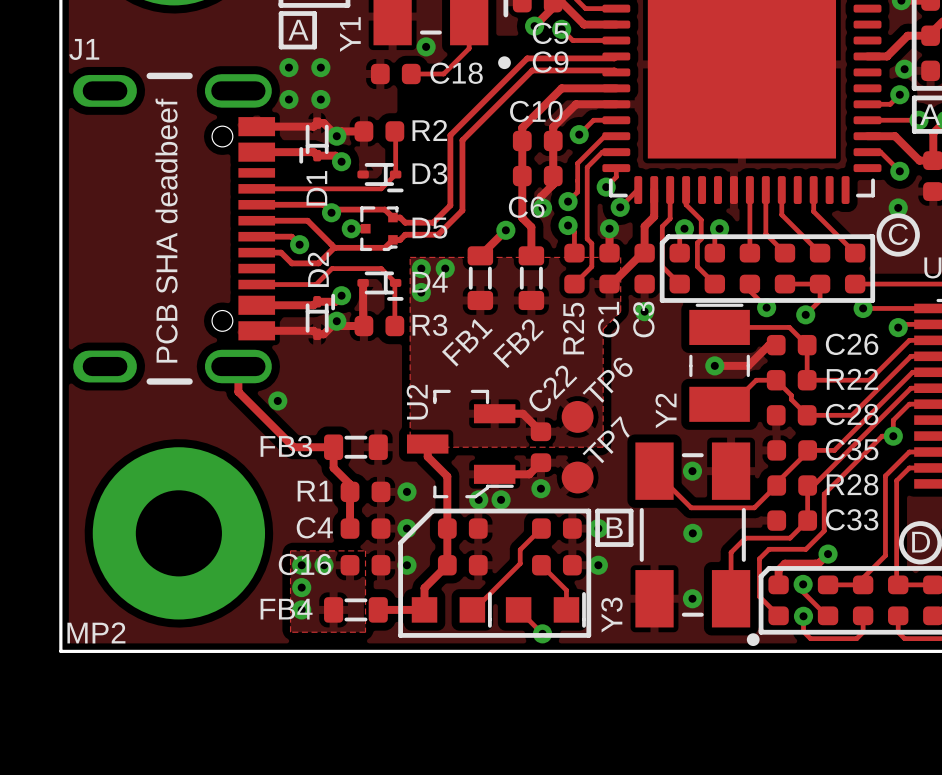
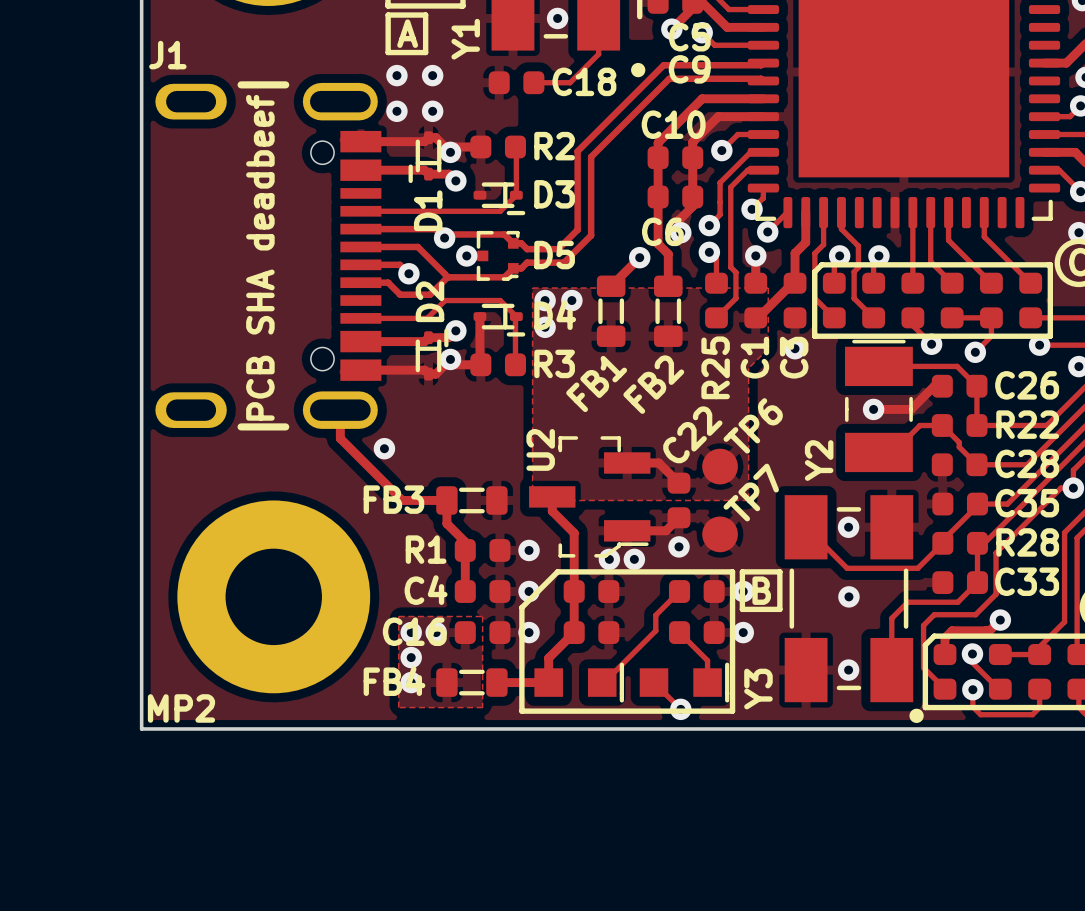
via: none -> (557, 18)
via: (426, 46) -> none

